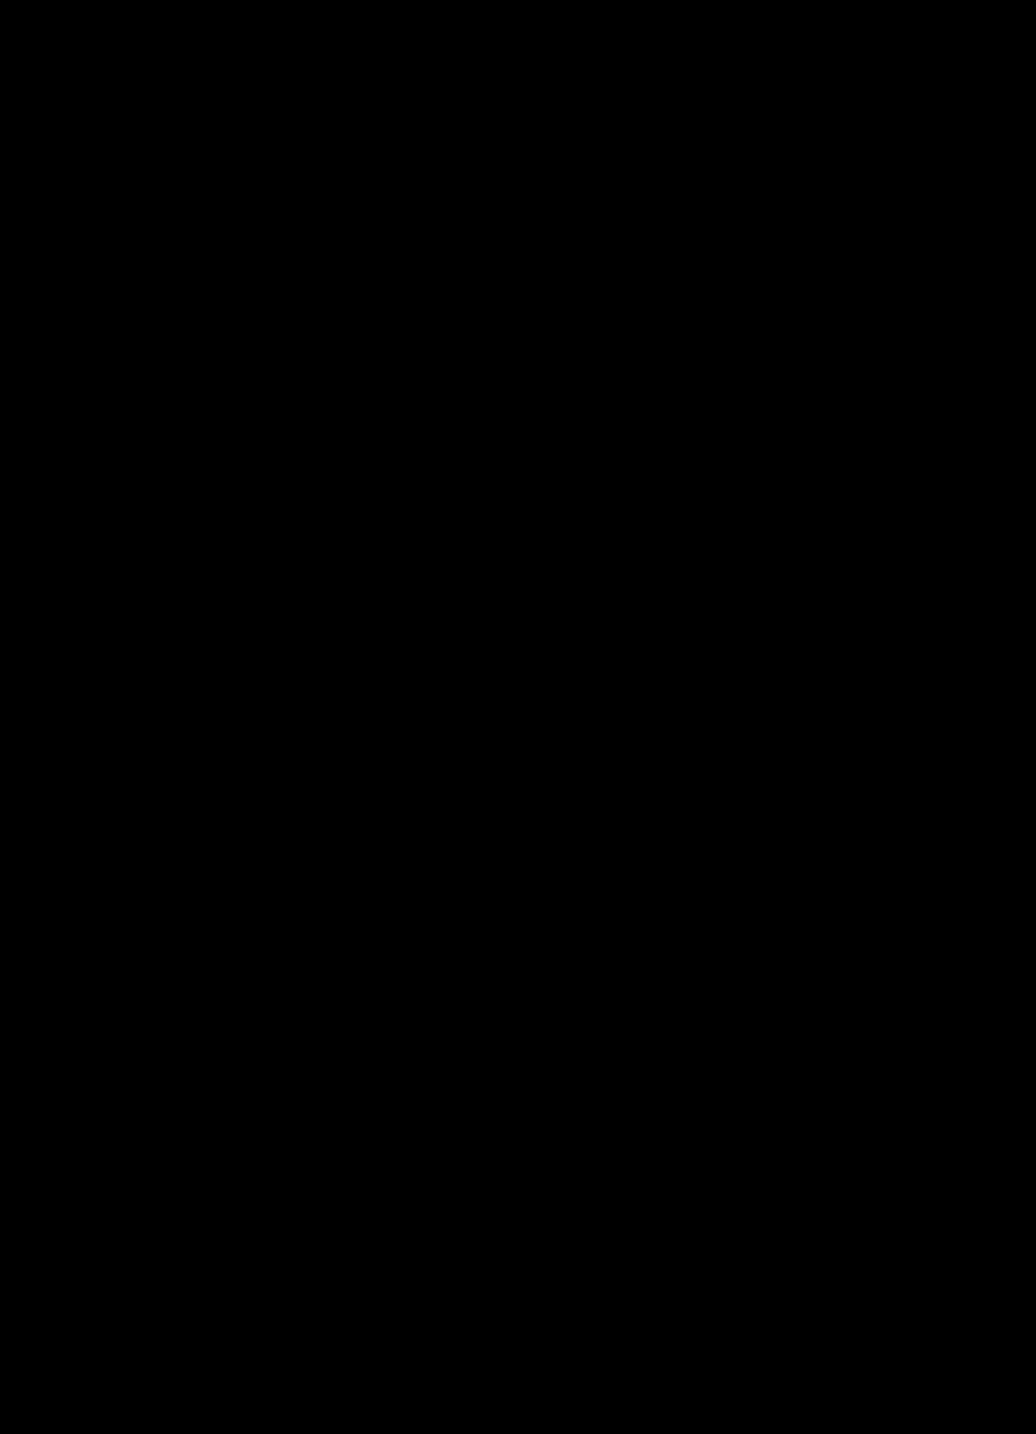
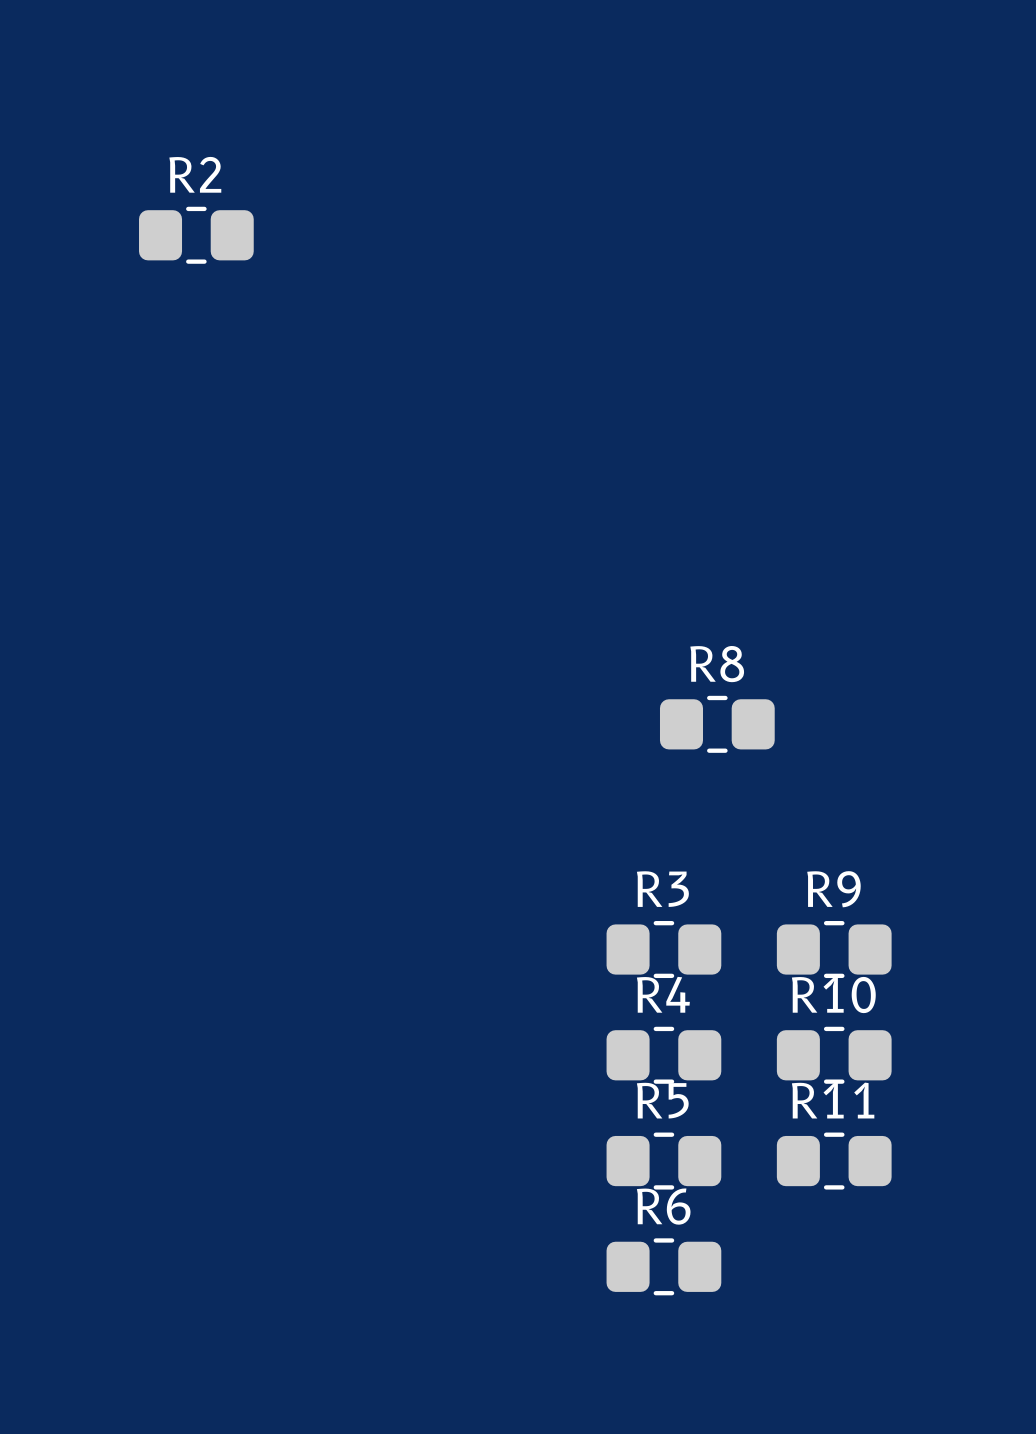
R2: none -> (196, 235)
R8: none -> (717, 724)
R3: none -> (663, 949)
R9: none -> (834, 949)
R4: none -> (663, 1055)
R10: none -> (834, 1055)
R5: none -> (663, 1161)
R11: none -> (834, 1161)
R6: none -> (663, 1266)

